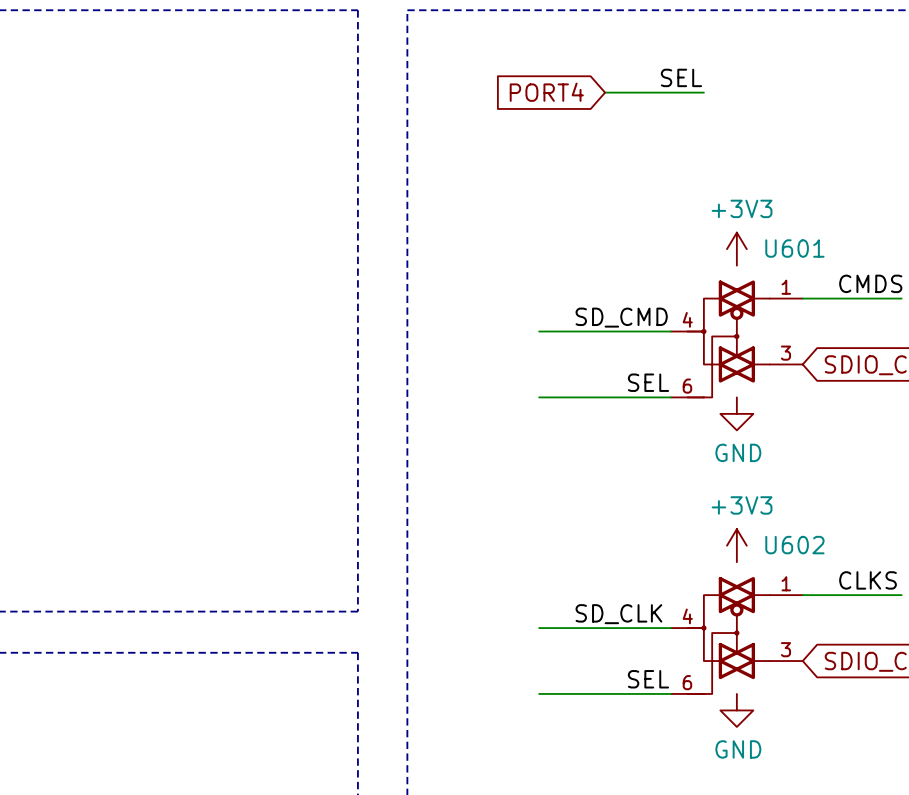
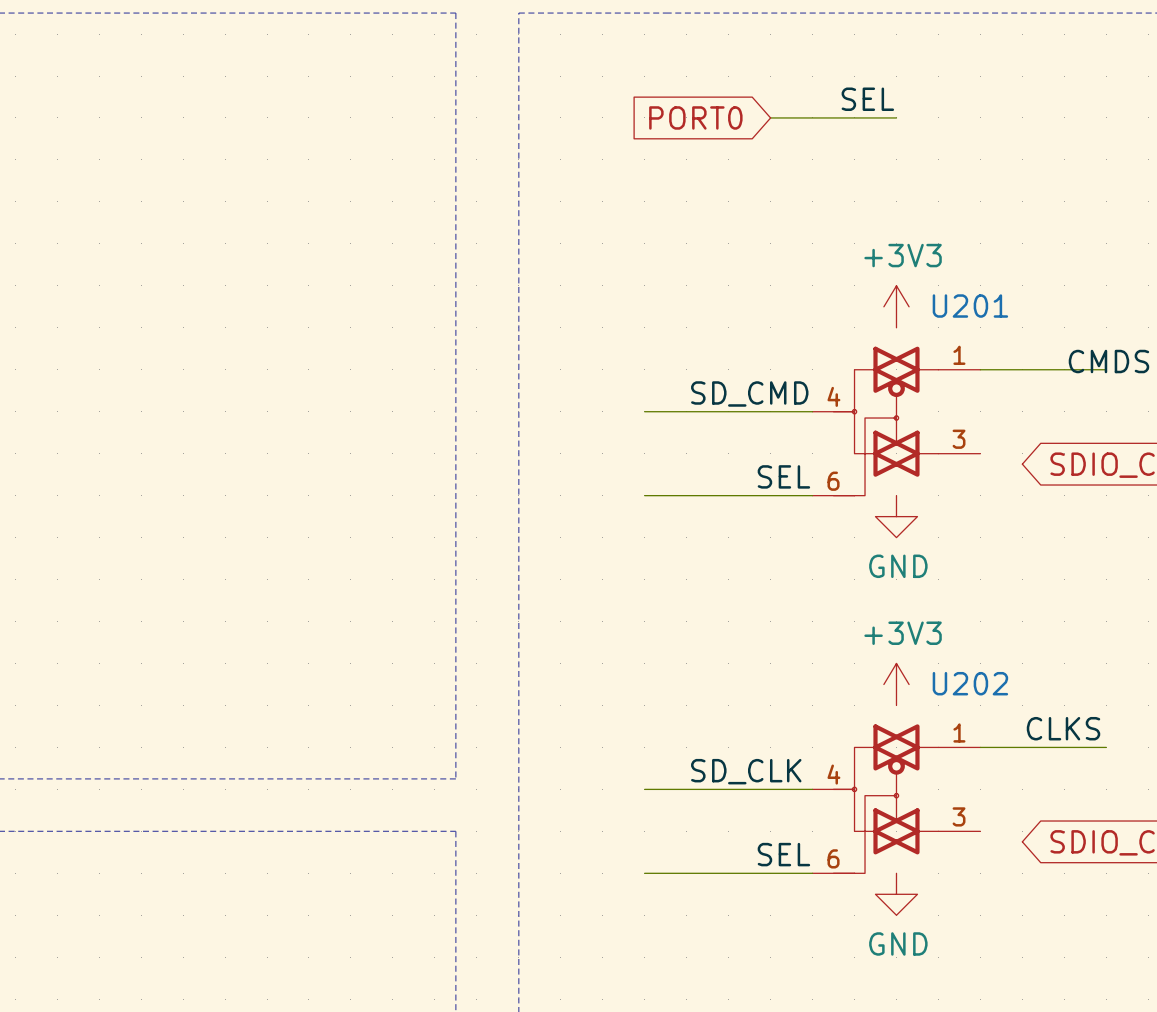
global label: PORT4 (546, 92) -> PORT0 (695, 117)
power symbol position: +3V3 (736, 249) -> +3V3 (896, 306)
wire: (802, 298) (901, 298) -> (980, 369) (1106, 369)
label position: SD_CMD (621, 317) -> SD_CMD (749, 393)
U201: none -> (896, 421)
wire: (539, 331) (670, 331) -> (644, 411) (812, 411)
U601: (736, 338) -> none
label position: SEL (648, 382) -> SEL (783, 476)
wire: (539, 397) (670, 397) -> (644, 495) (812, 495)
power symbol position: GND (736, 413) -> GND (896, 516)
power symbol position: +3V3 (736, 545) -> +3V3 (896, 684)
label position: CLKS (868, 580) -> CLKS (1063, 728)
wire: (802, 595) (901, 595) -> (980, 747) (1106, 747)
label position: SD_CLK (618, 614) -> SD_CLK (746, 771)
U202: none -> (896, 798)
wire: (539, 628) (670, 628) -> (644, 789) (812, 789)
U602: (736, 635) -> none
label position: SEL (648, 679) -> SEL (783, 854)
wire: (539, 693) (670, 693) -> (644, 873) (812, 873)
power symbol position: GND (736, 710) -> GND (896, 894)

